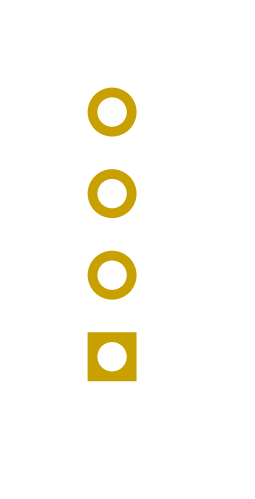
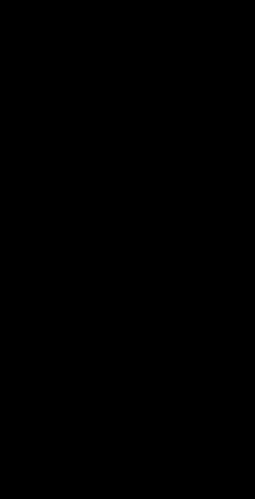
part: (112, 234) -> none

